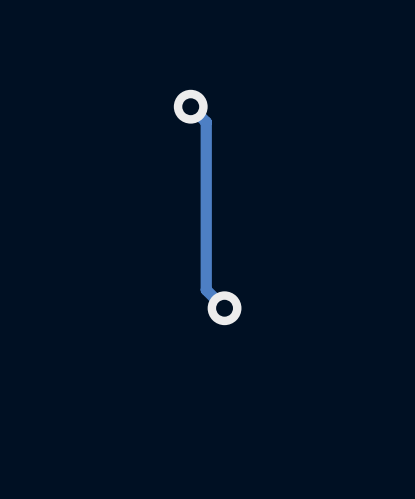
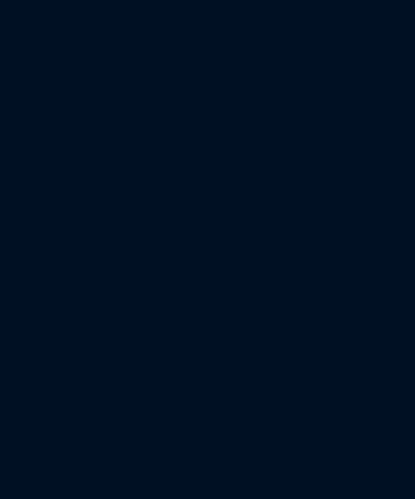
track: (190, 106) (206, 122) (206, 289) (224, 308) -> none
via: (190, 106) -> none
via: (224, 308) -> none

